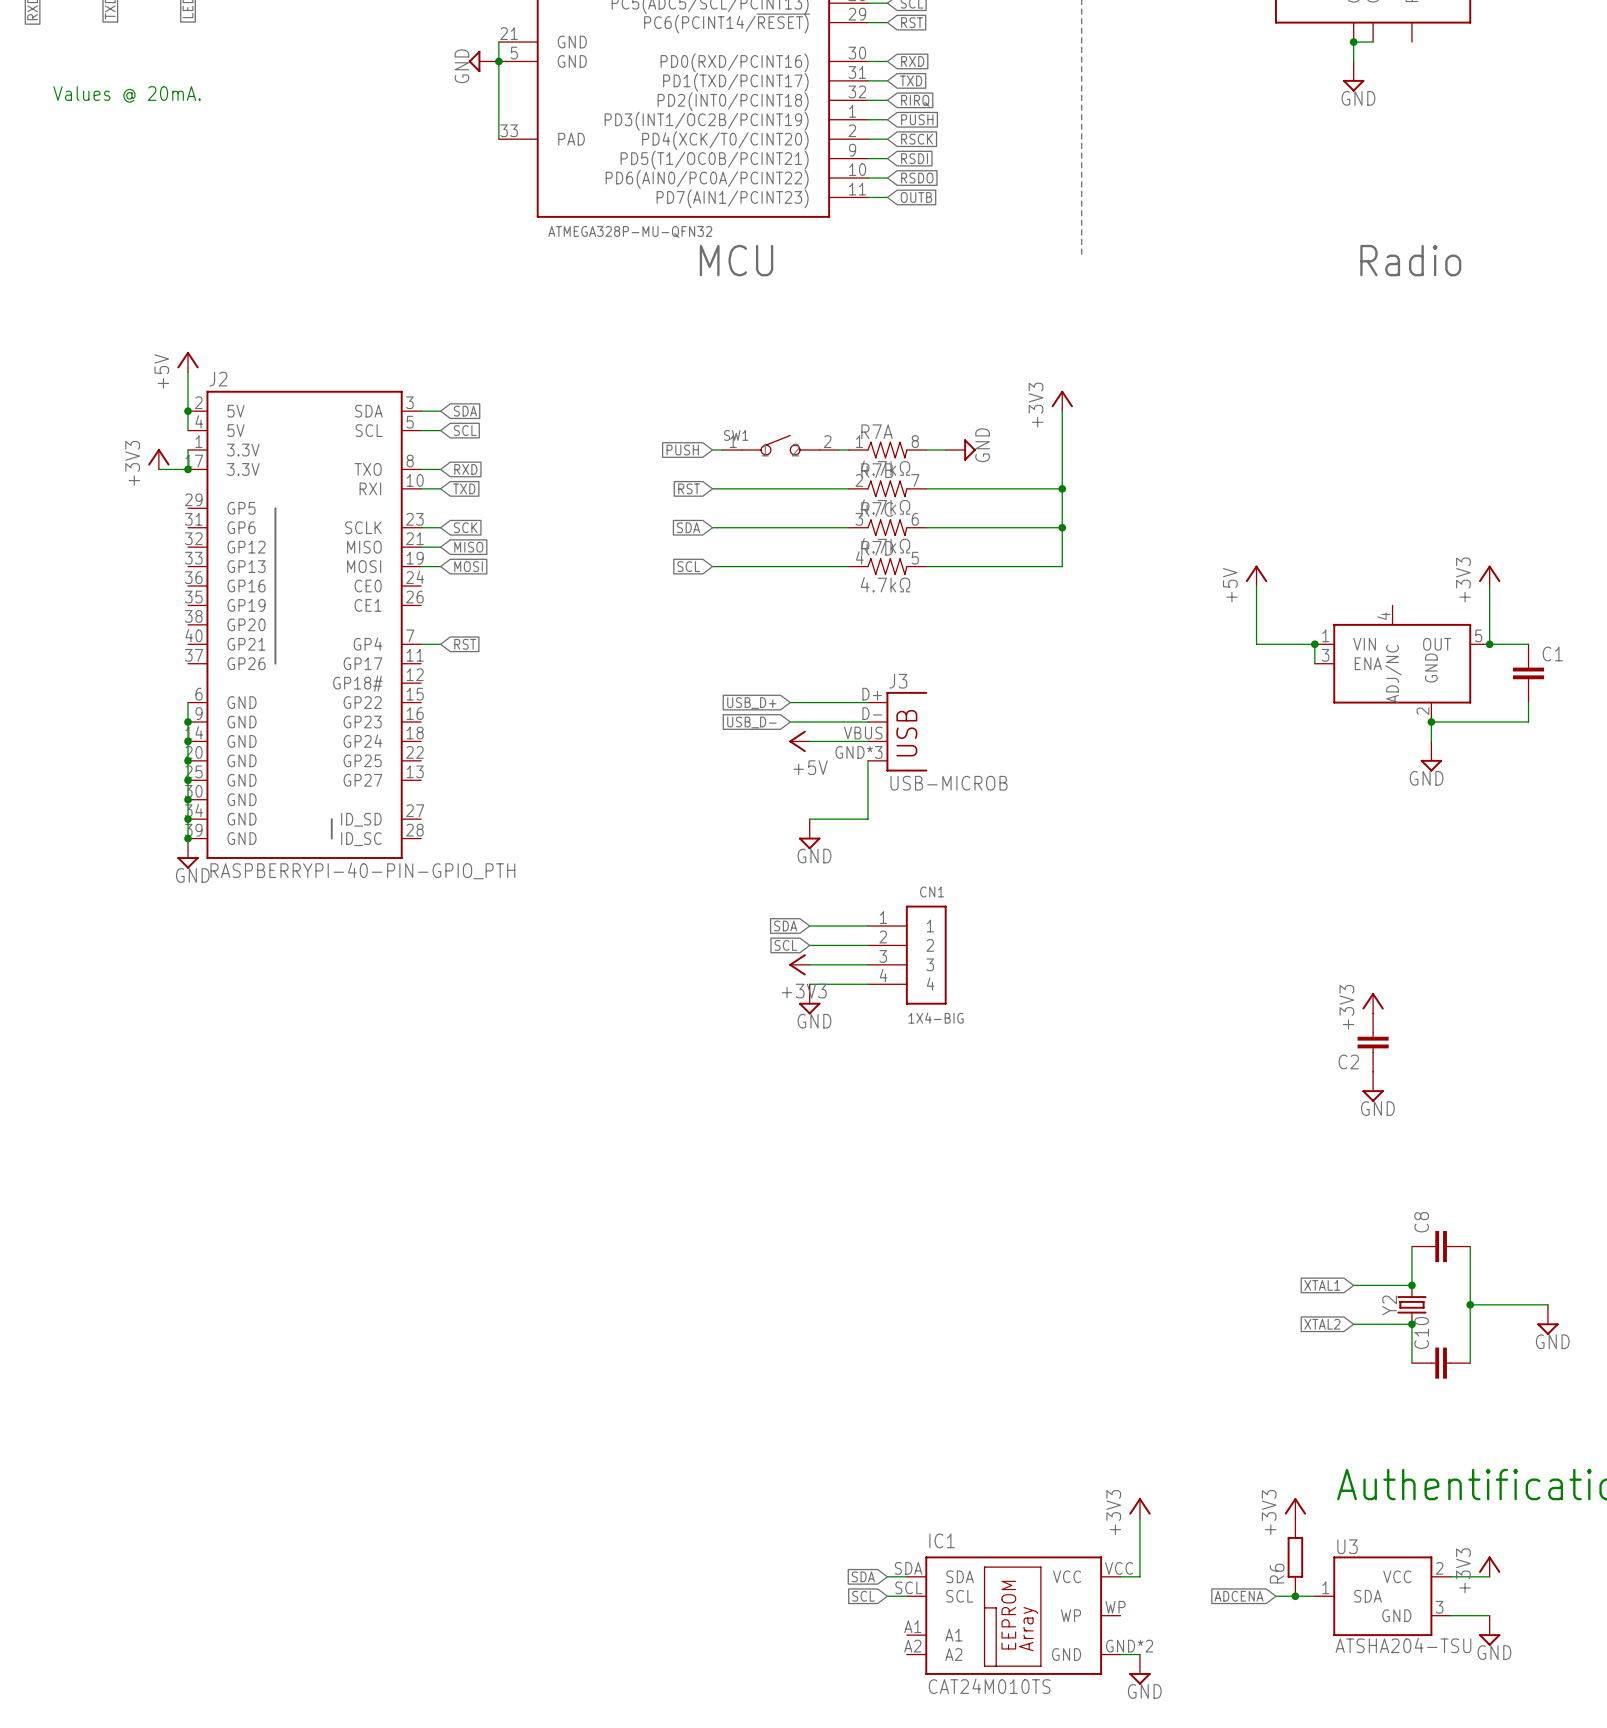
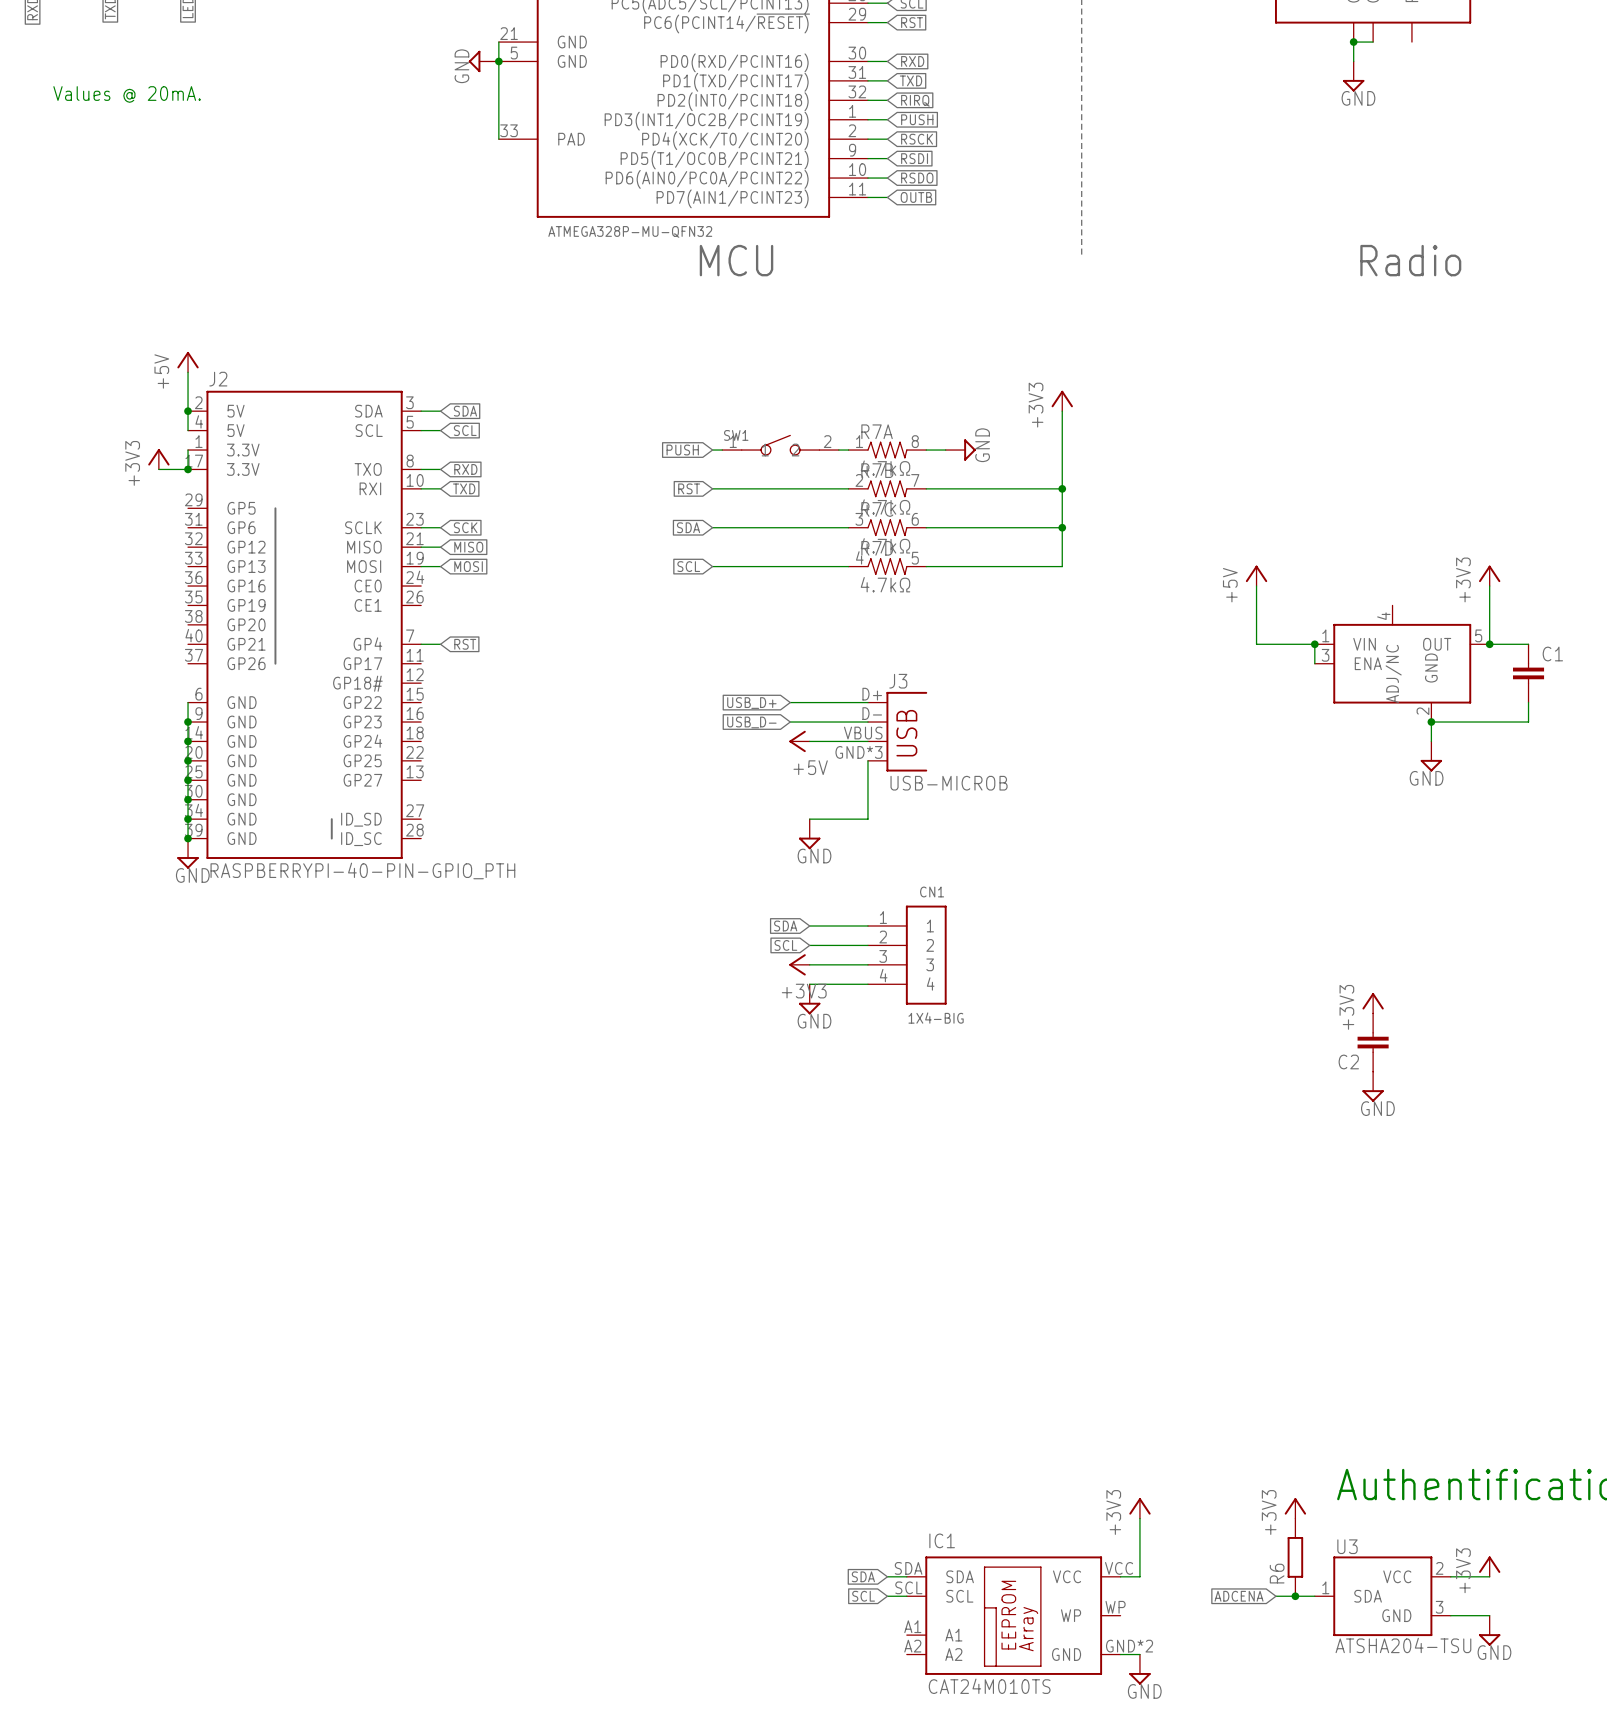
wire: (1411, 1246) (1411, 1285) (1353, 1285) -> none
C8: (1441, 1246) -> none
wire: (1470, 1246) (1470, 1363) -> none
global label: XTAL1 (1322, 1285) -> none
junction: (1411, 1285) -> none
Y2: (1411, 1304) -> none
wire: (1470, 1304) (1547, 1304) -> none
junction: (1470, 1304) -> none
power symbol: GND (1547, 1319) -> none
global label: XTAL2 (1322, 1324) -> none
wire: (1353, 1324) (1411, 1324) (1411, 1363) -> none
junction: (1411, 1324) -> none
C10: (1441, 1363) -> none

